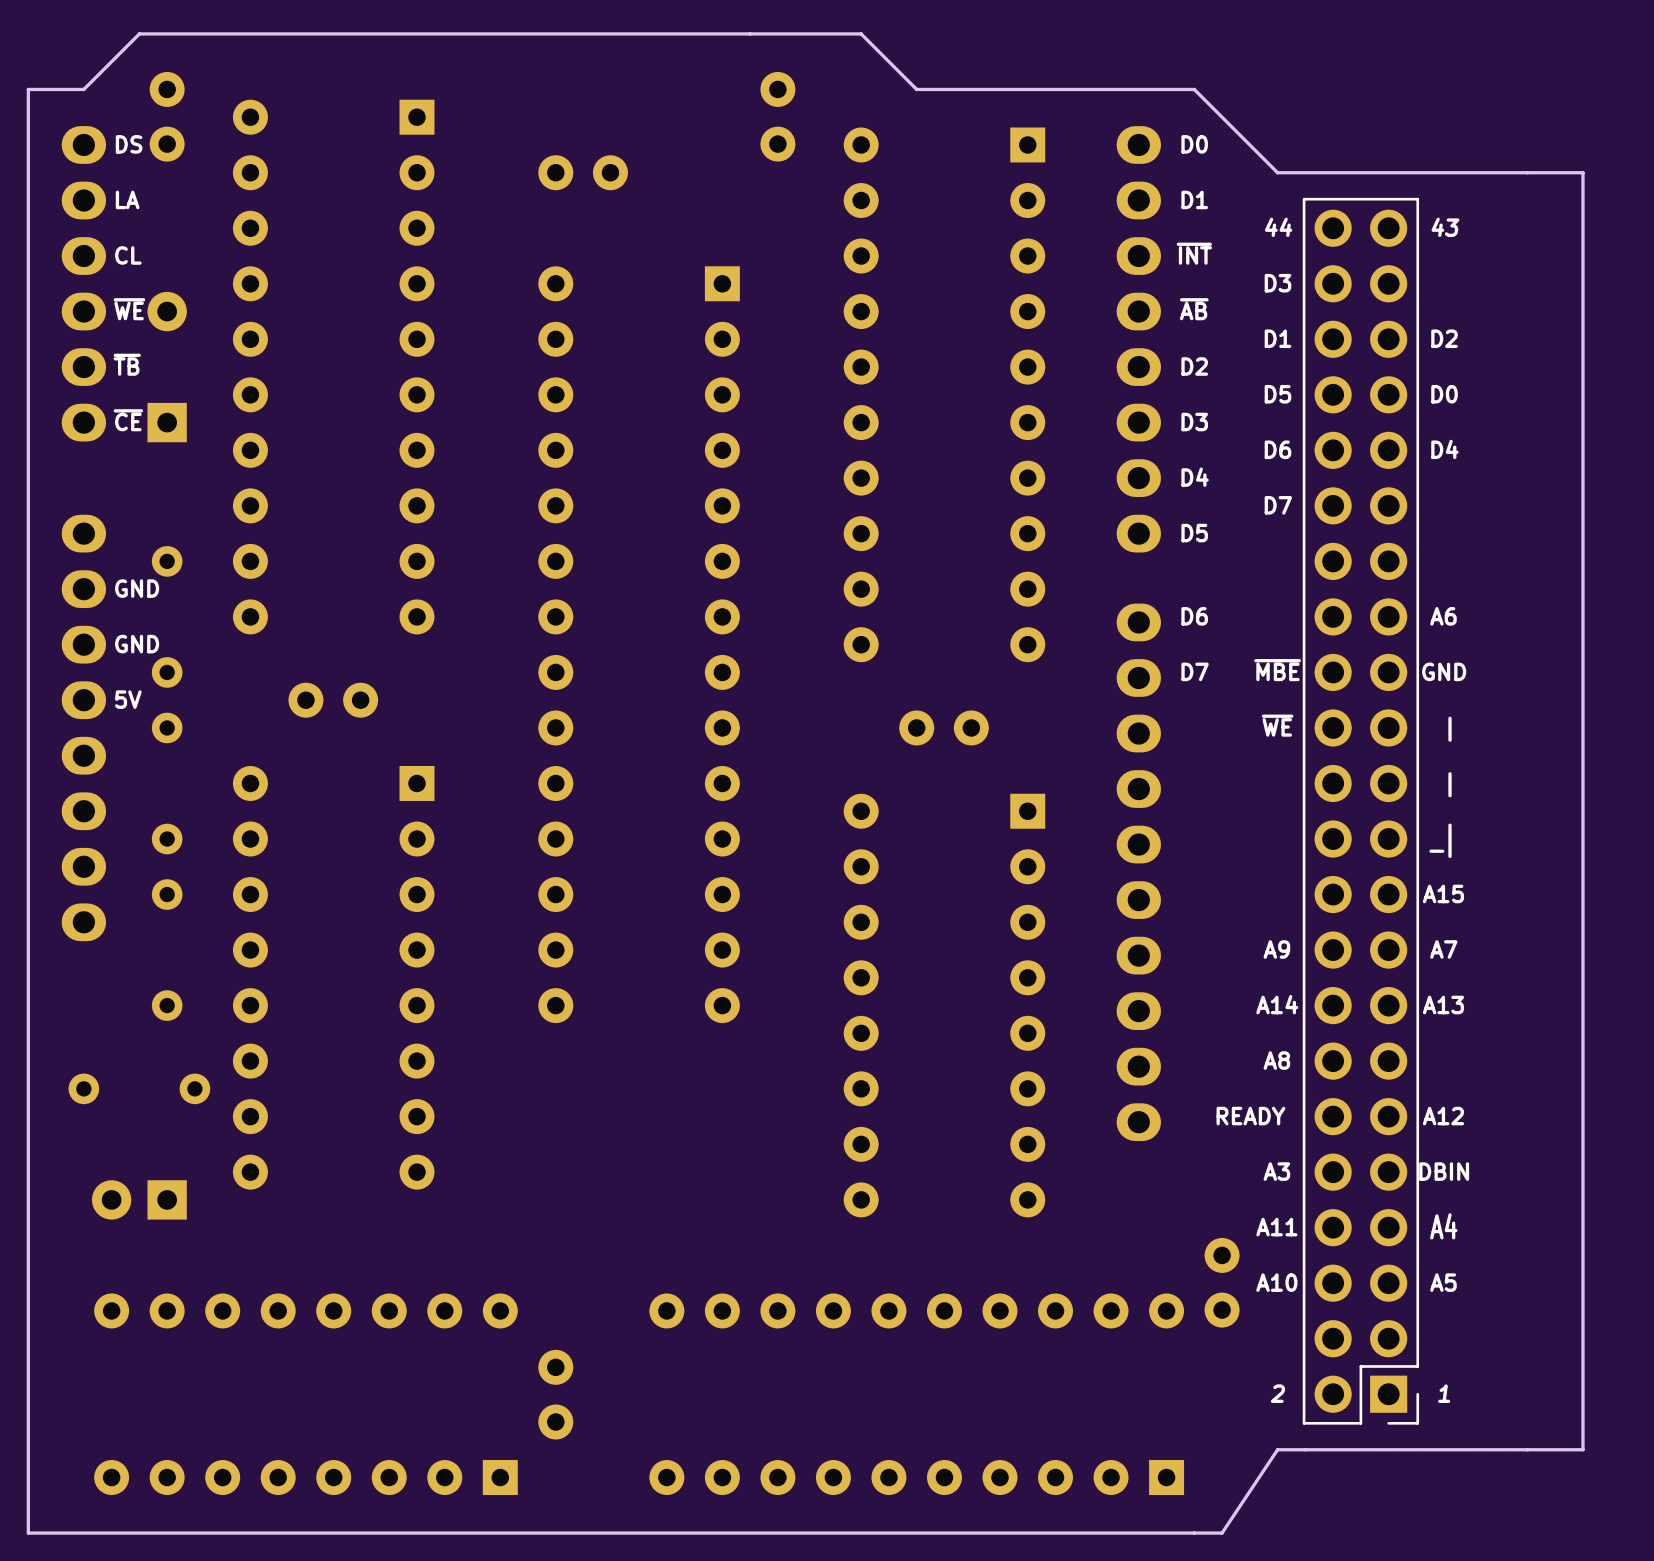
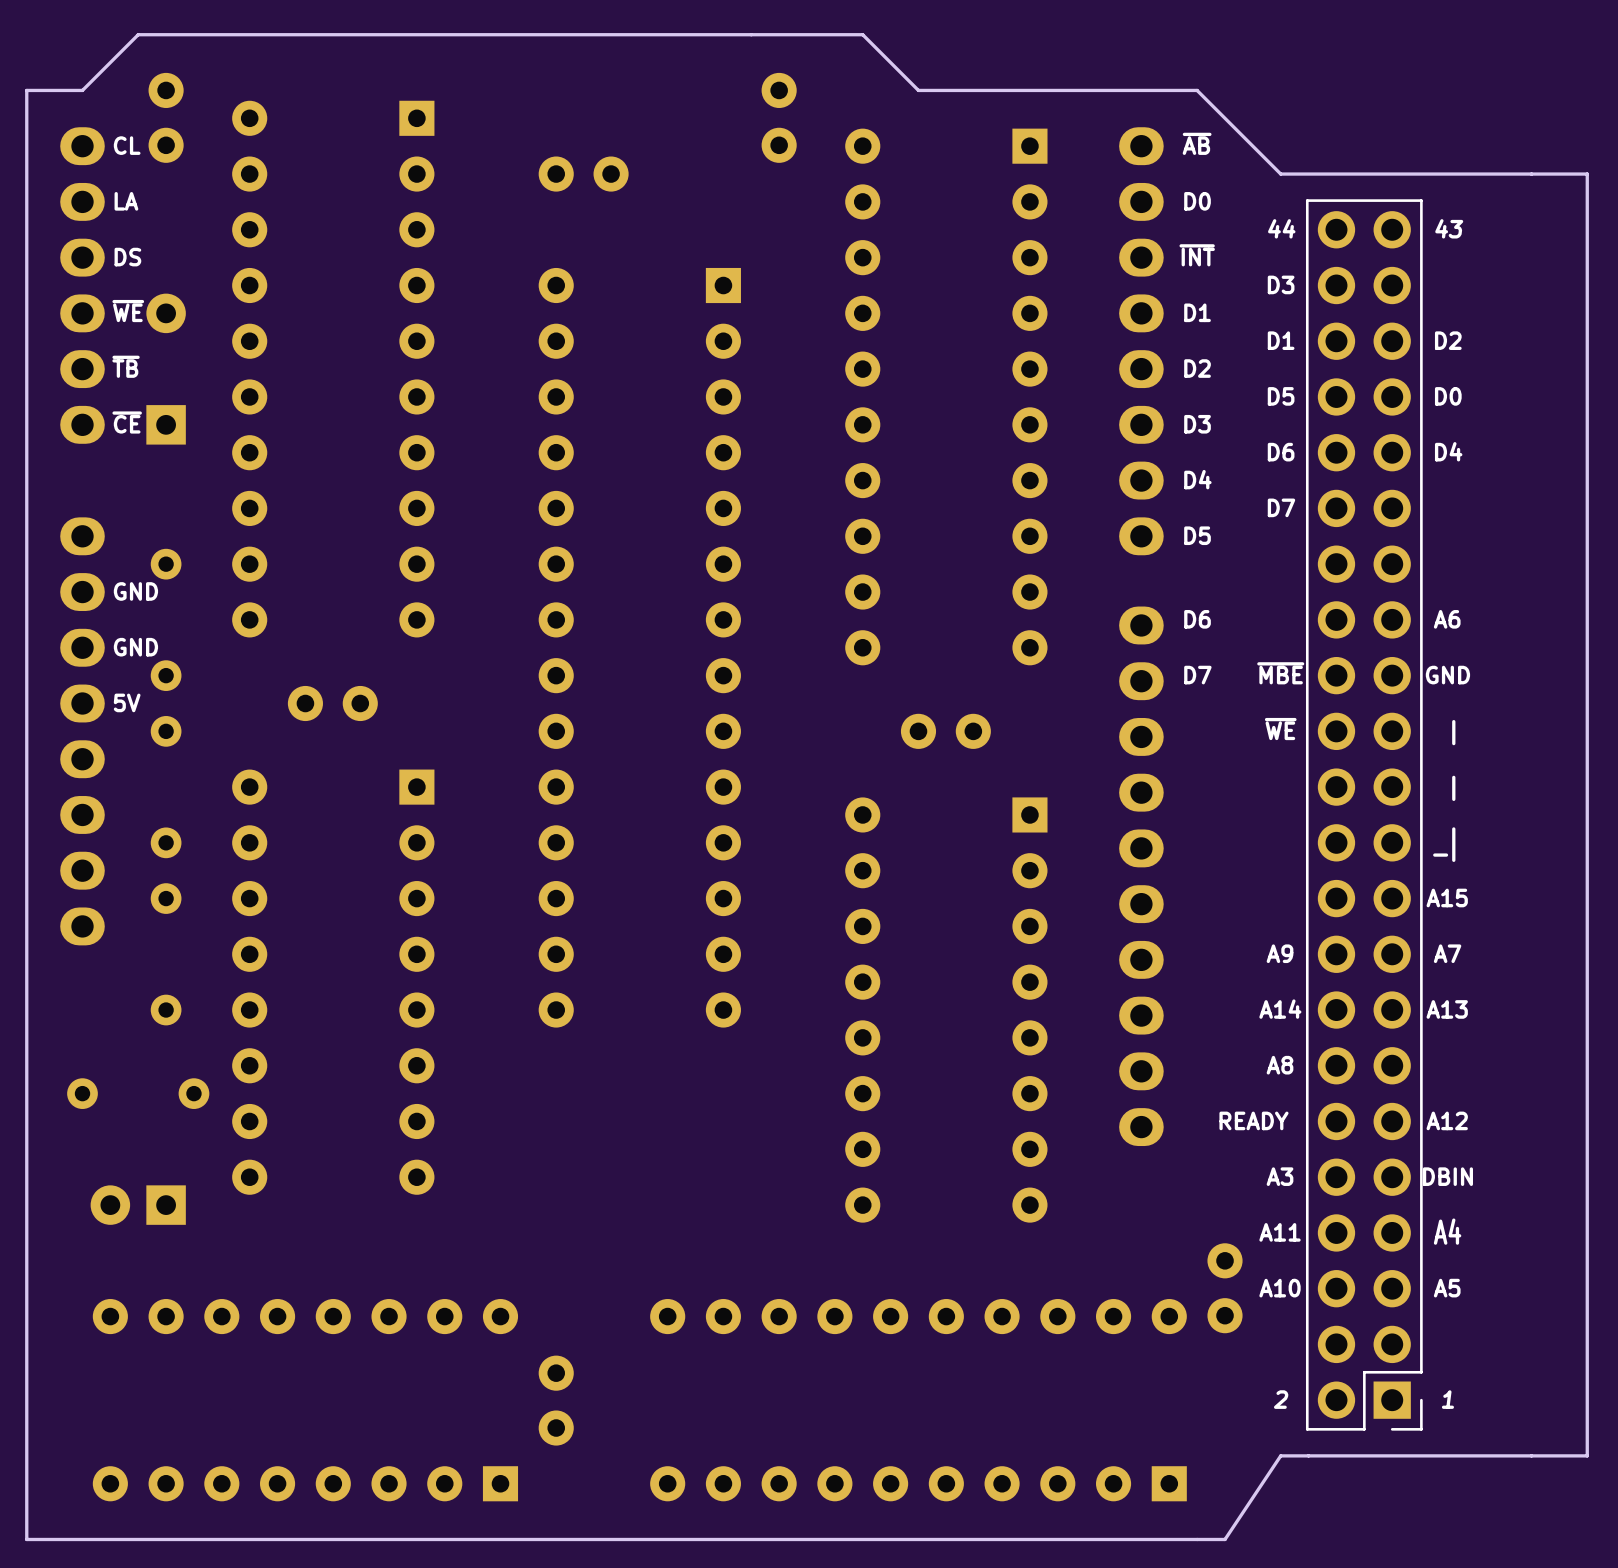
text: DS (129, 144) -> CL (127, 145)
text: D0 (1194, 144) -> ~{AB} (1197, 143)
text: D1 (1194, 199) -> D0 (1197, 201)
text: CL (128, 255) -> DS (127, 257)
text: ~{AB} (1194, 309) -> D1 (1197, 312)

